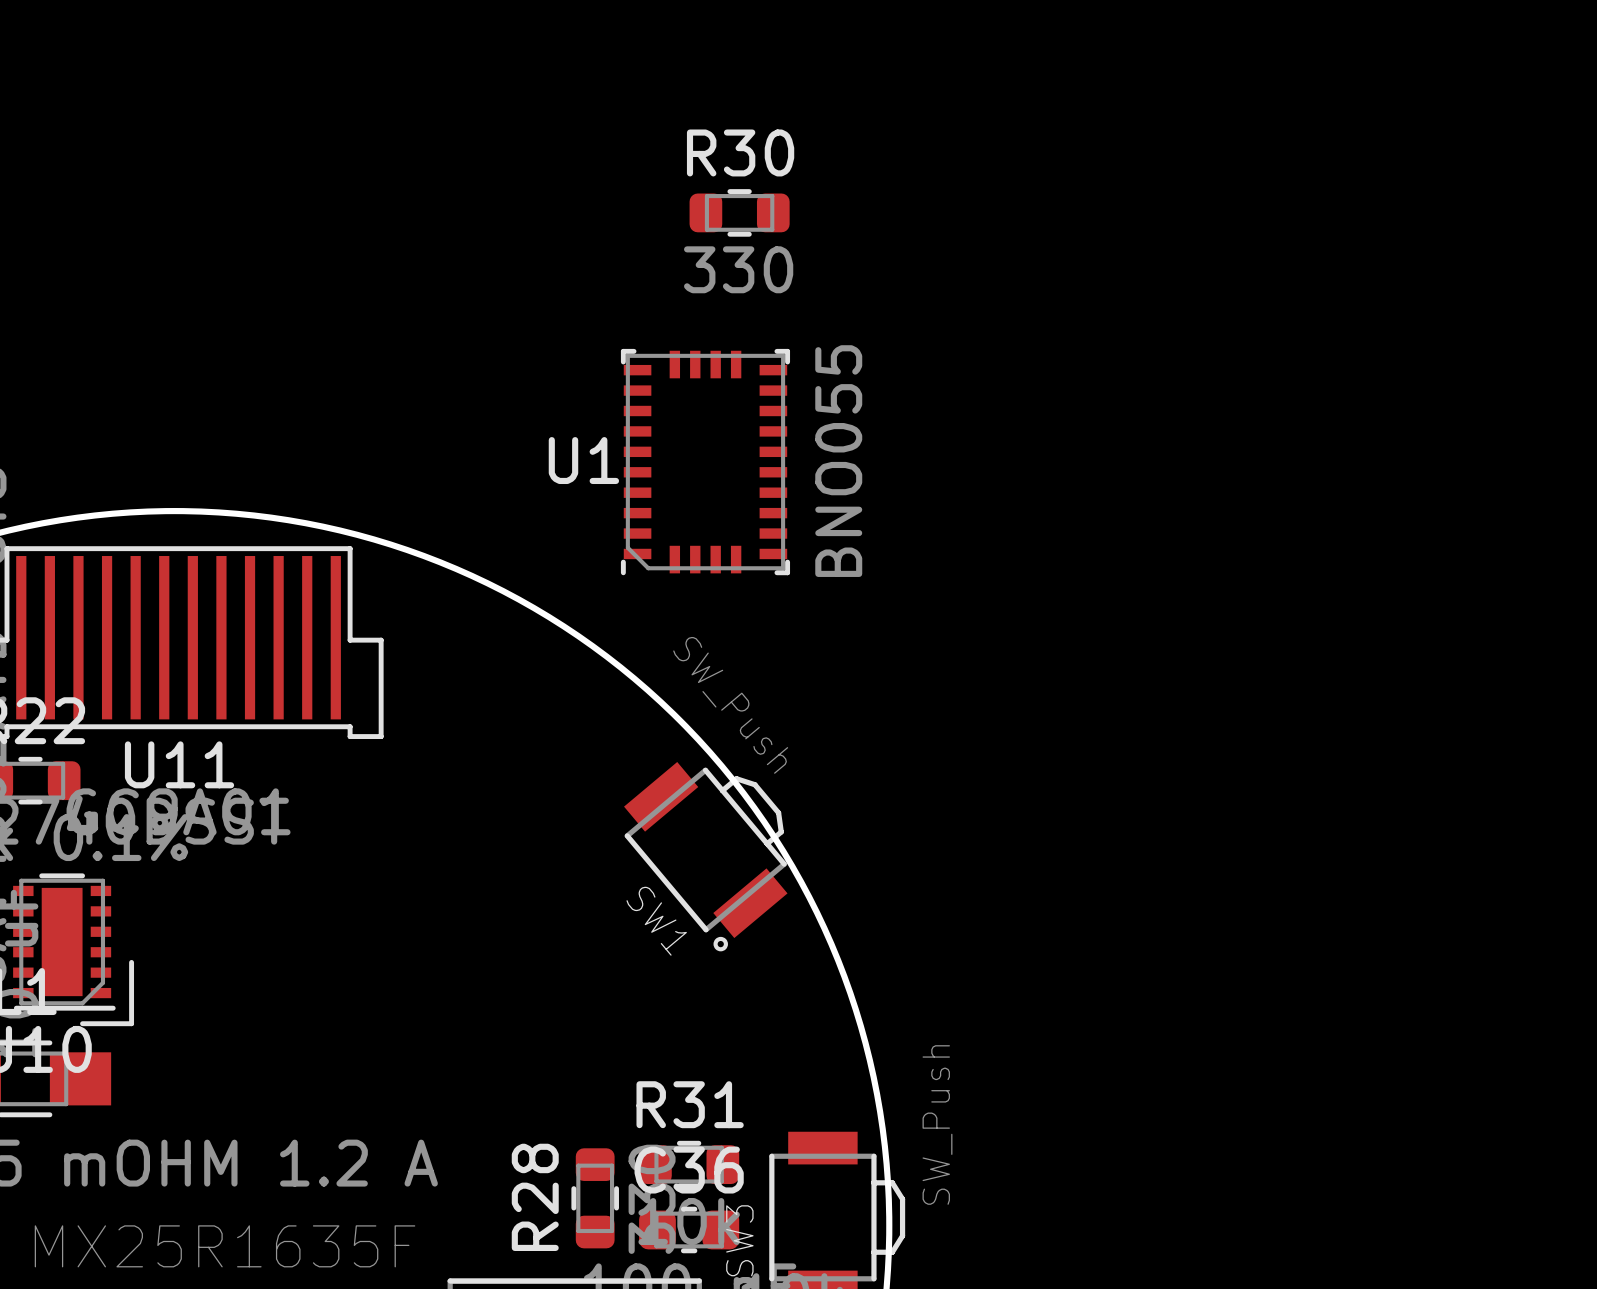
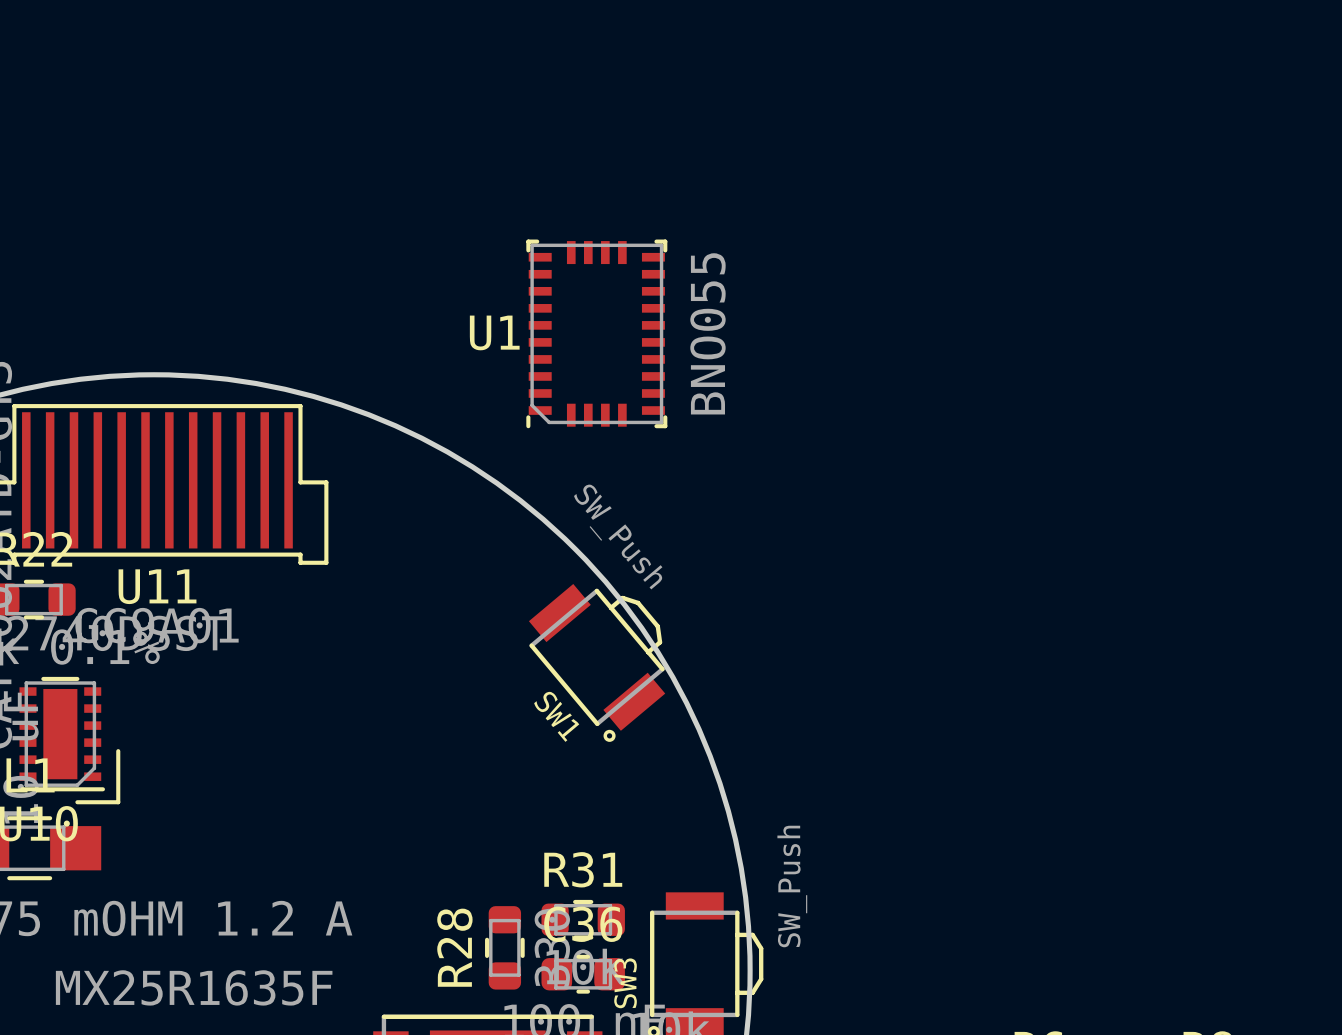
R30: 330 (739, 212) -> none

